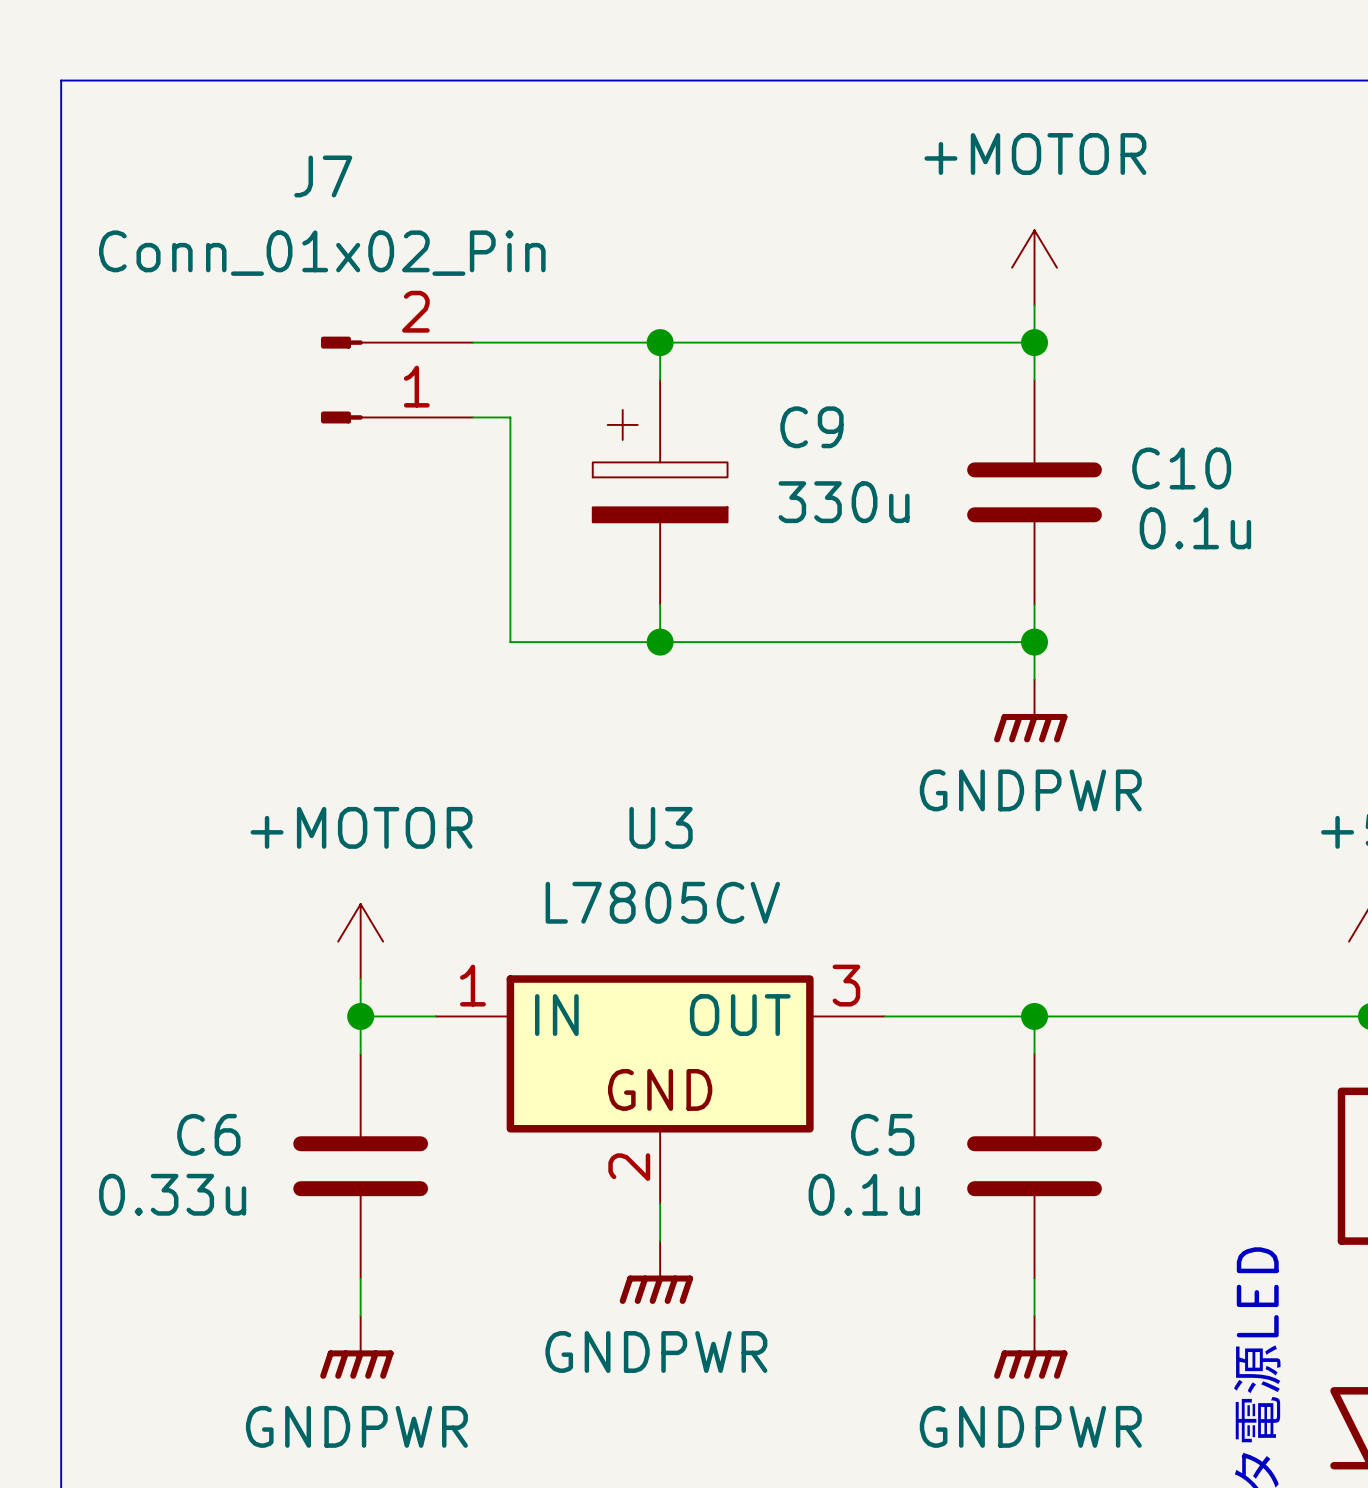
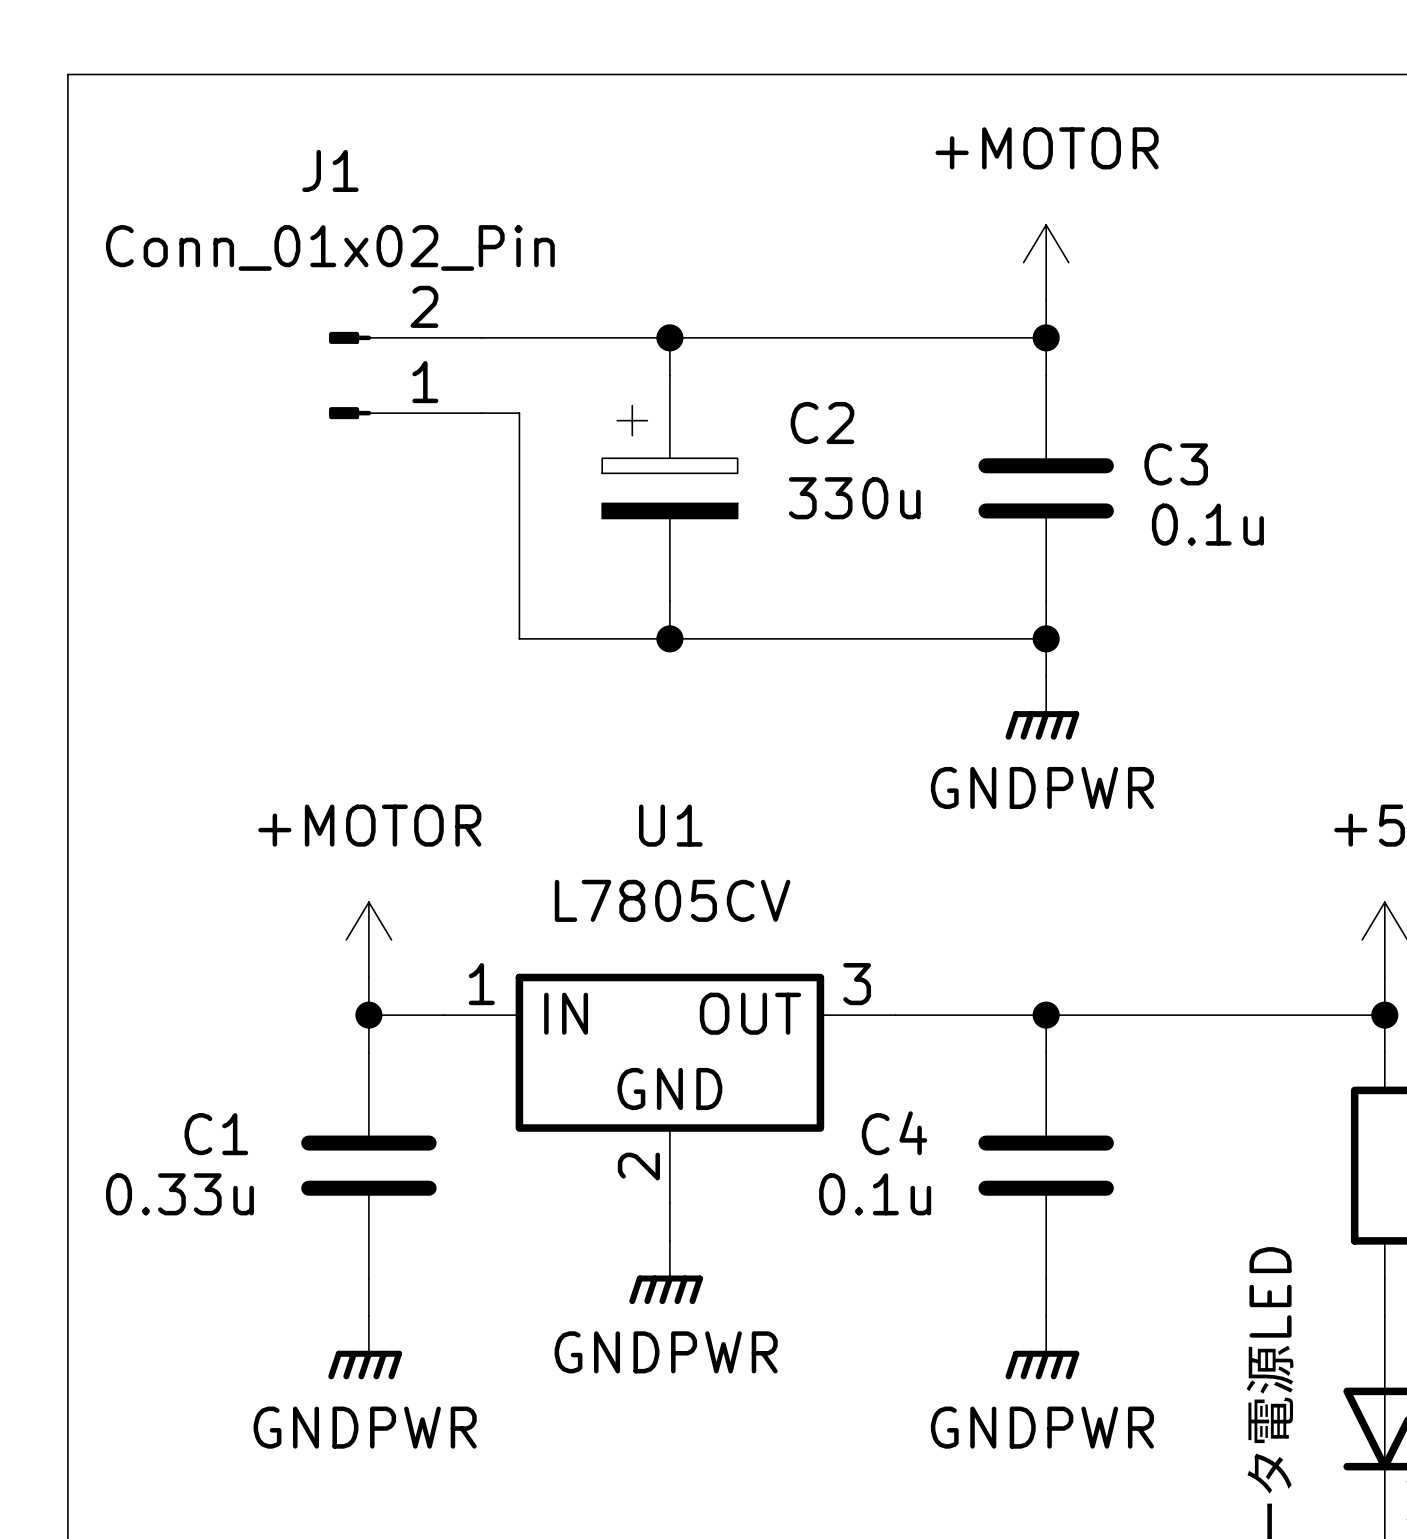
J7 name: J7 (323, 176) -> J1 (330, 170)
C9 name: C9 (811, 427) -> C2 (822, 423)
C10 name: C10 (1181, 468) -> C3 (1176, 464)
U3 name: U3 (661, 827) -> U1 (670, 825)
C6 name: C6 (208, 1134) -> C1 (216, 1134)
C5 name: C5 (882, 1134) -> C4 (894, 1133)

